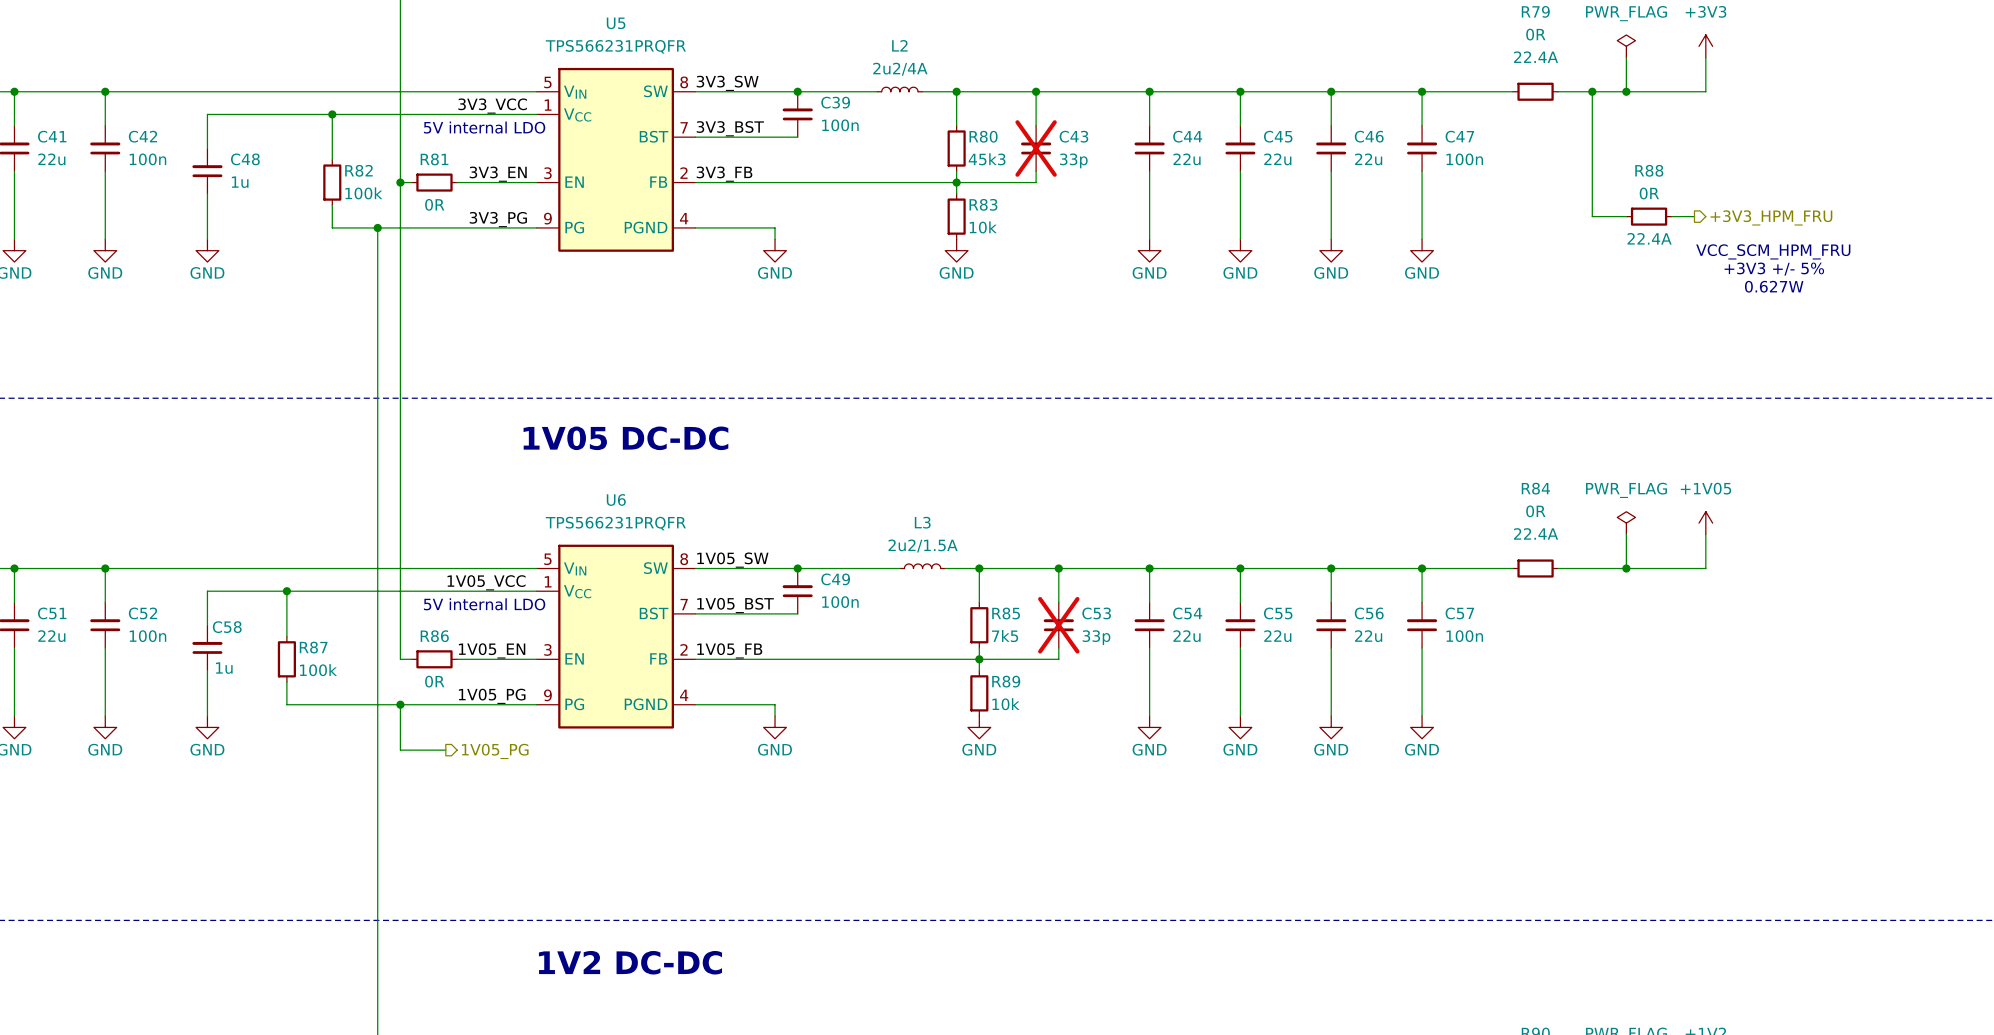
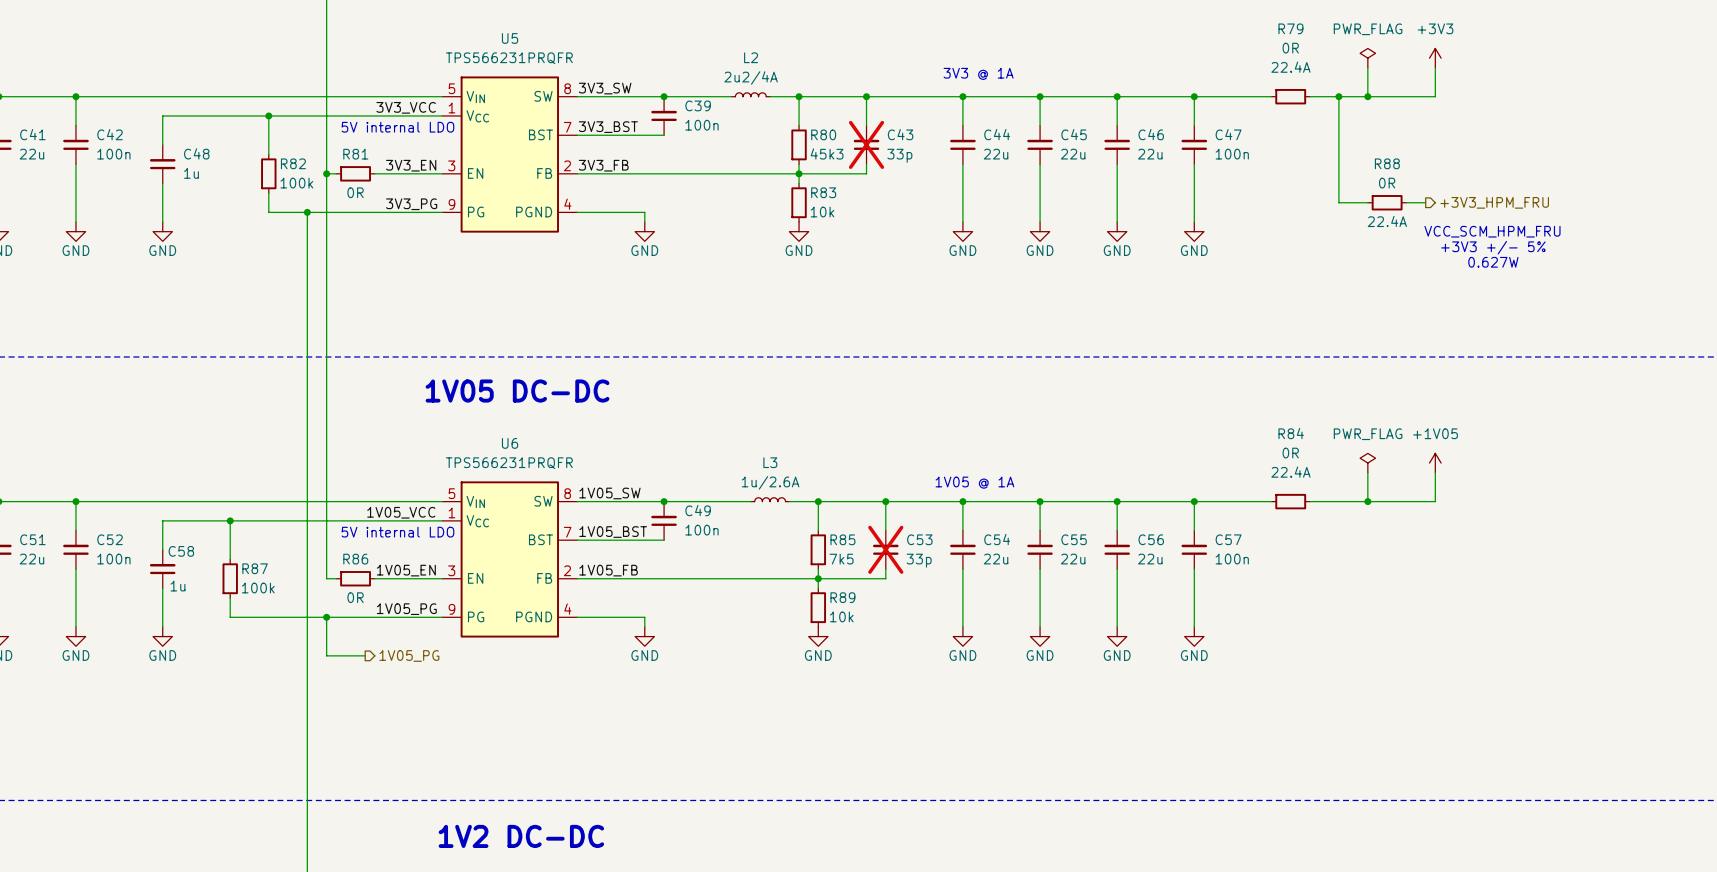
text: none -> 3V3 @ 1A (978, 73)
L3 text: 2u2/1.5A (923, 546) -> 1u/2.6A (770, 482)
text: none -> 1V05 @ 1A (974, 482)

